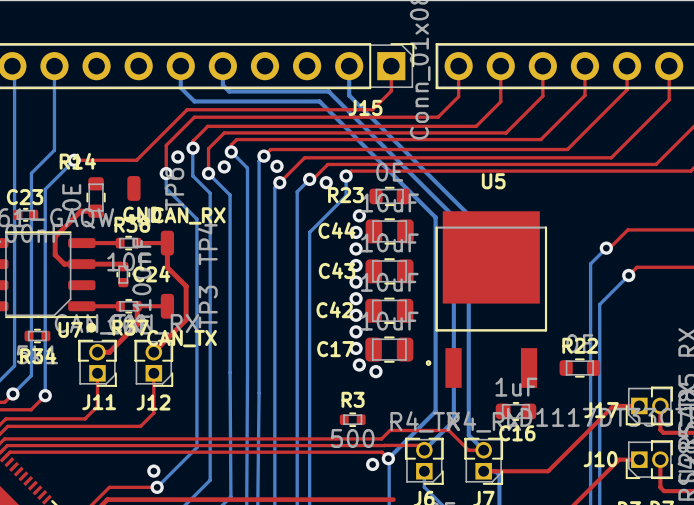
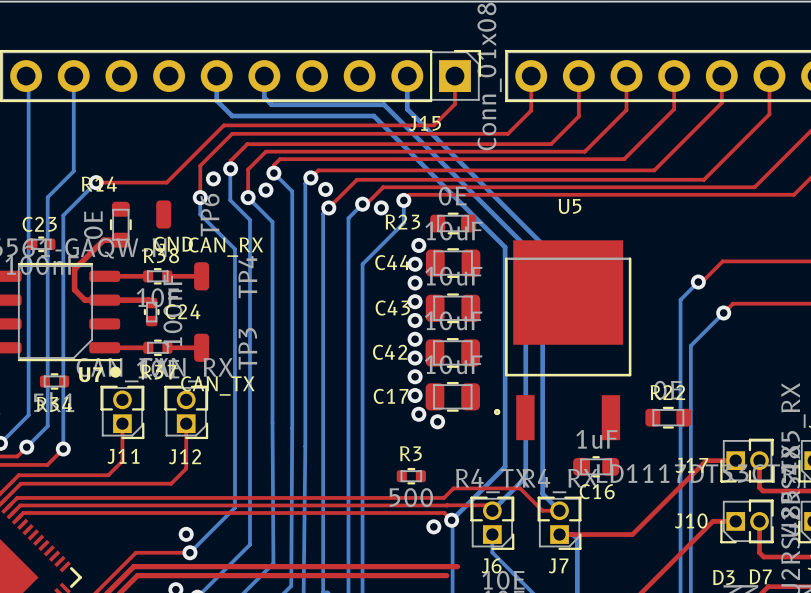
top track: (167, 243) (167, 267) (186, 286) (186, 319) (153, 352) -> none
top track: (137, 306) (137, 324) (109, 352) (97, 352) -> none

